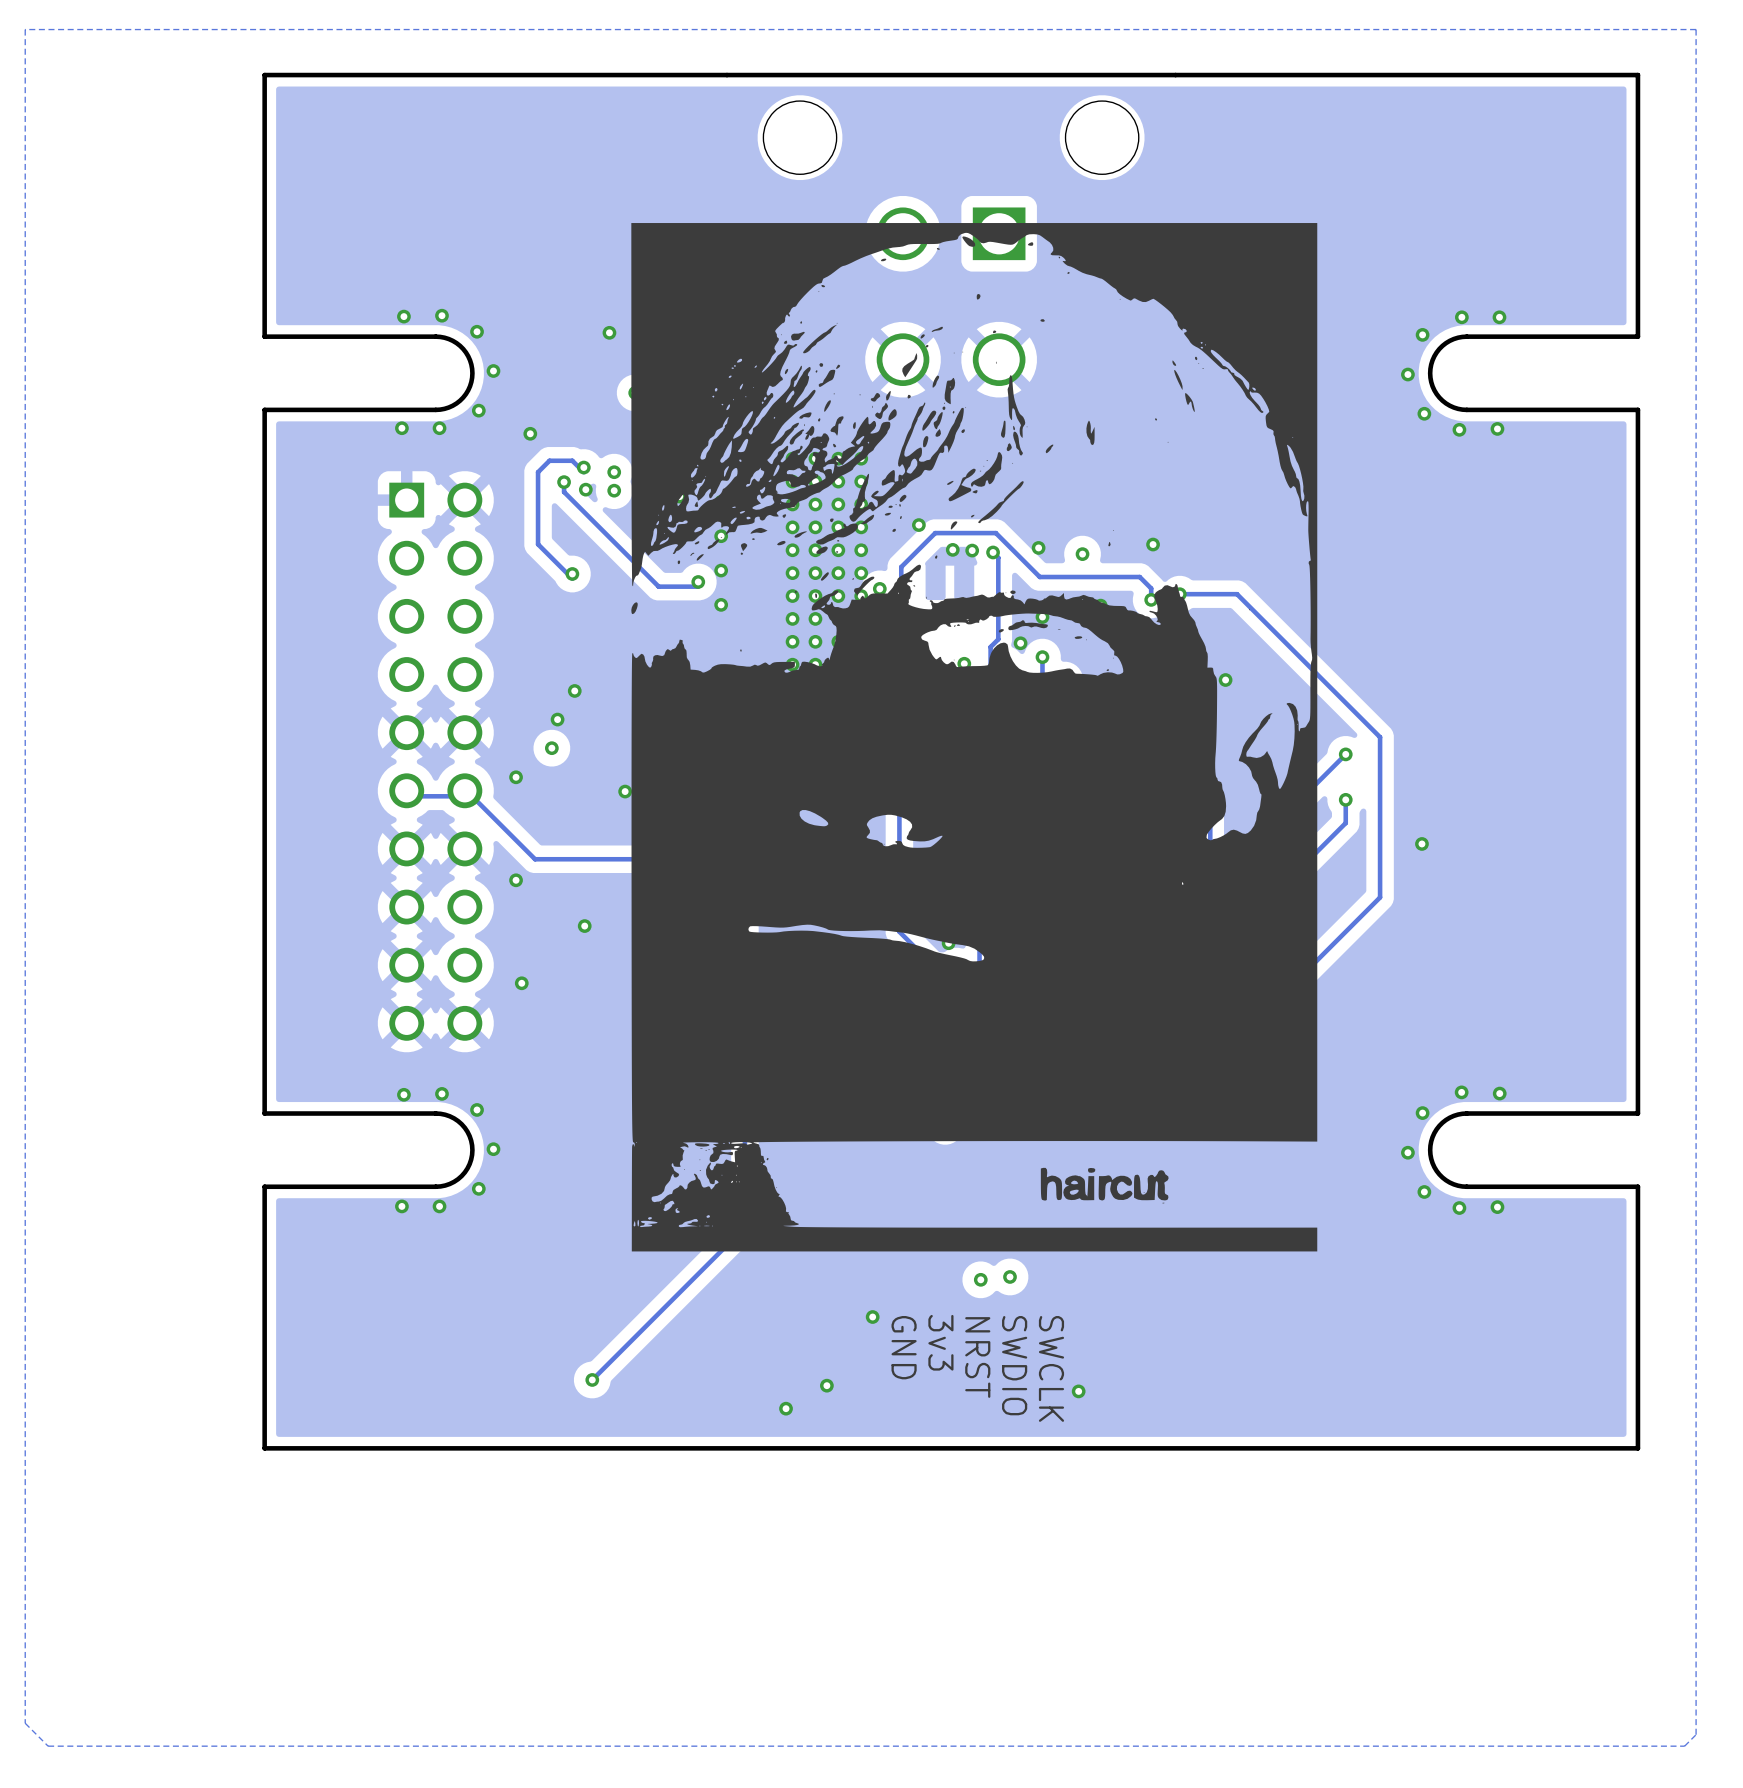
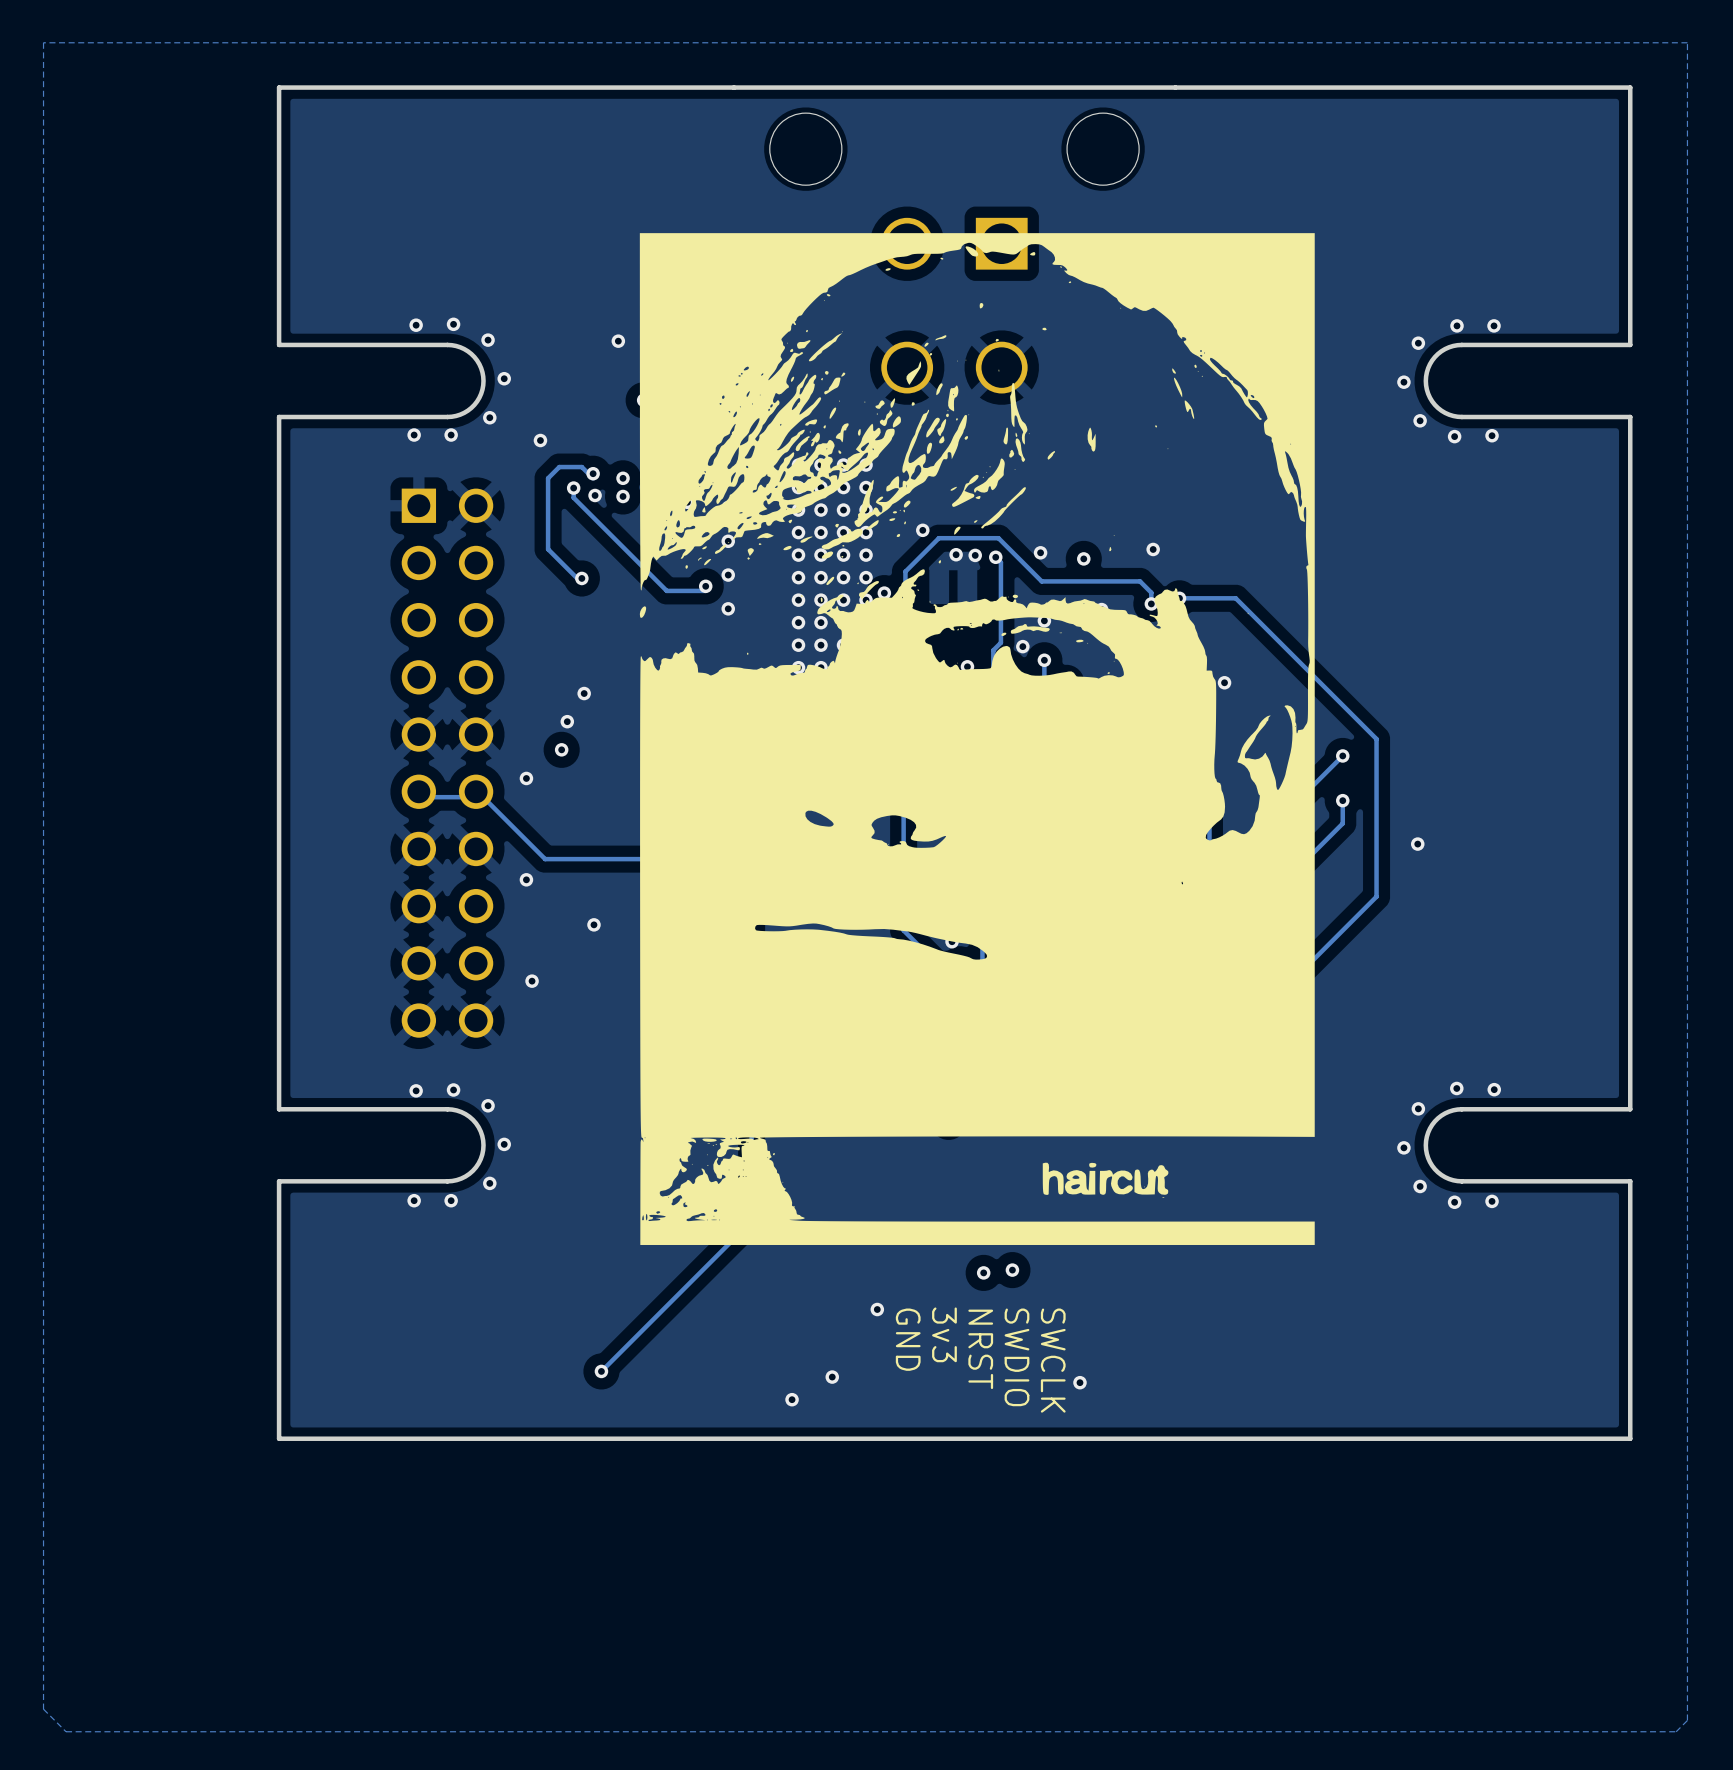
via: (625, 791) -> none

